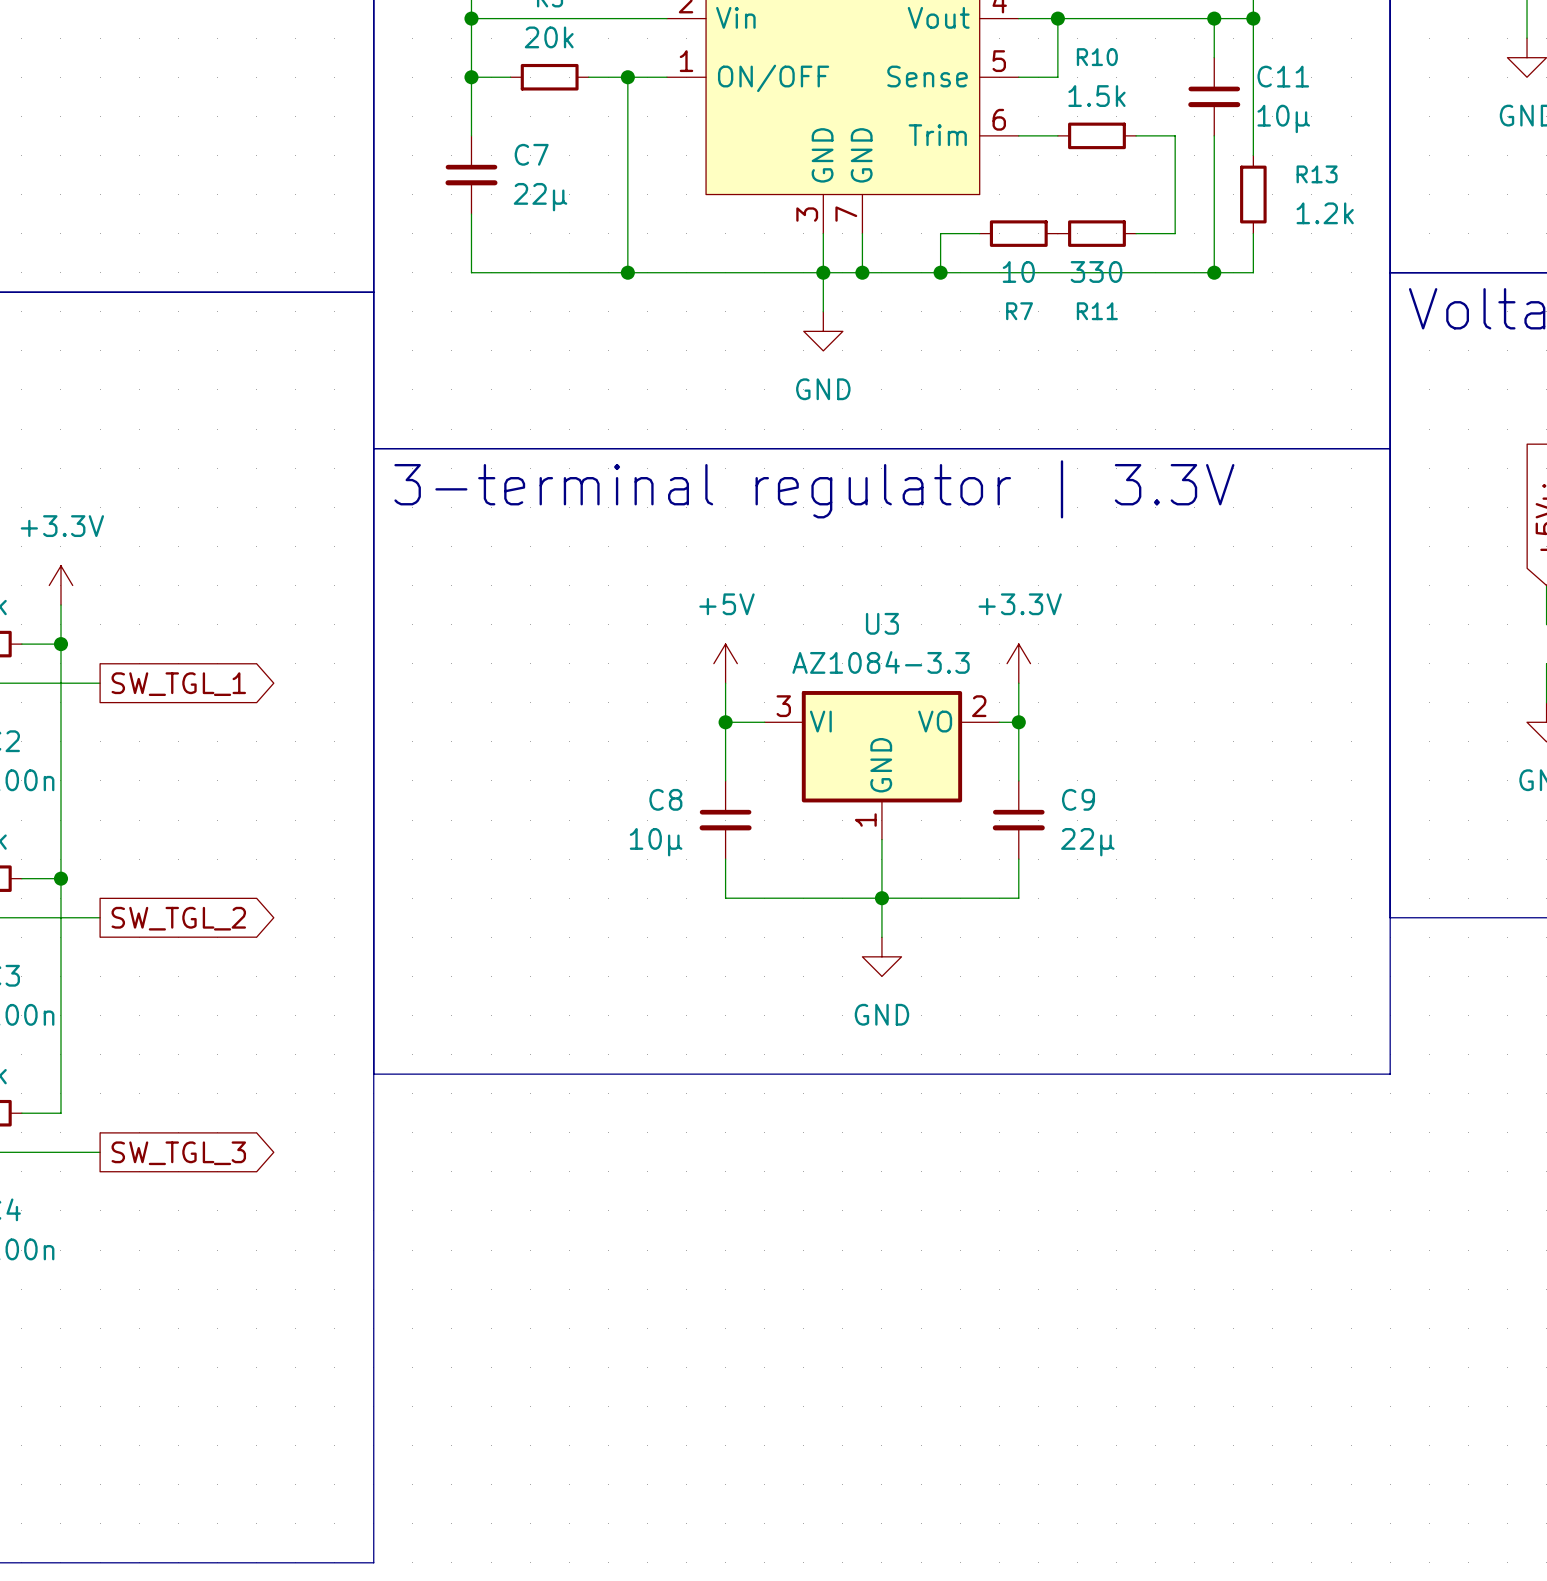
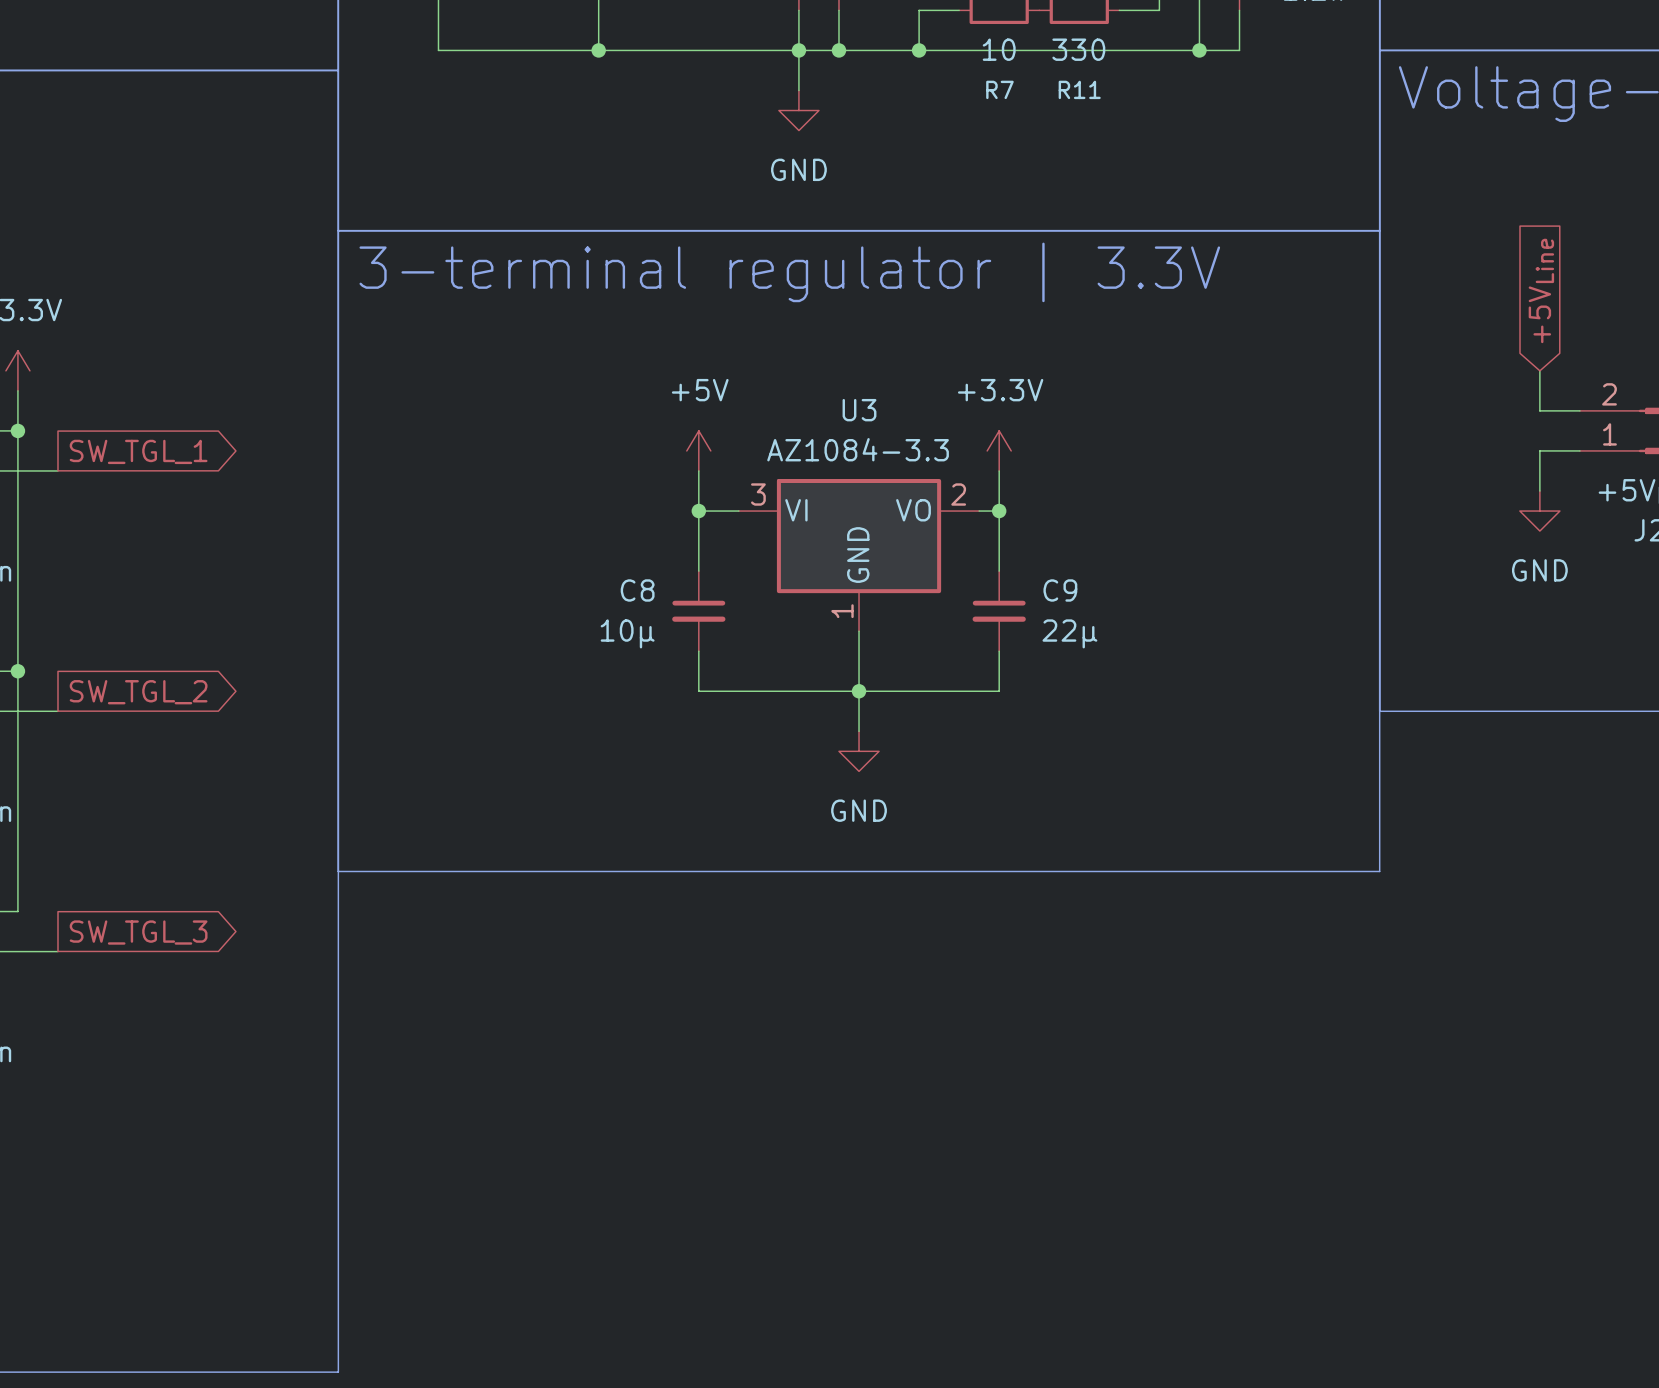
global label position: SW_TGL_1 (178, 684) -> SW_TGL_1 (138, 451)
global label position: SW_TGL_2 (178, 918) -> SW_TGL_2 (138, 692)
global label position: SW_TGL_3 (178, 1153) -> SW_TGL_3 (138, 932)

